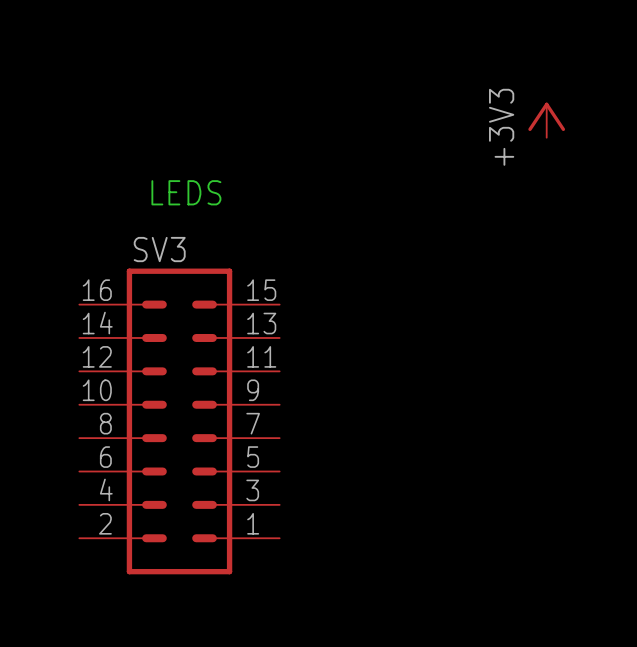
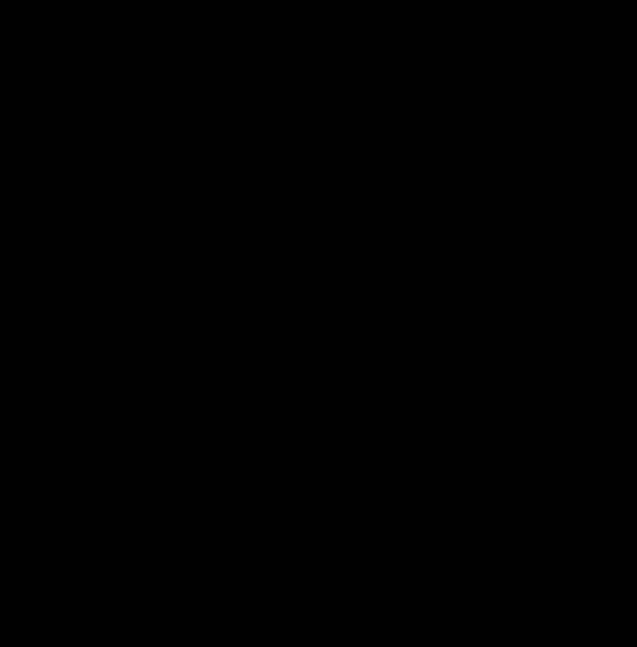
power symbol: +3V3 (546, 120) -> none
text: LEDS (186, 192) -> none
SV3: (179, 421) -> none

